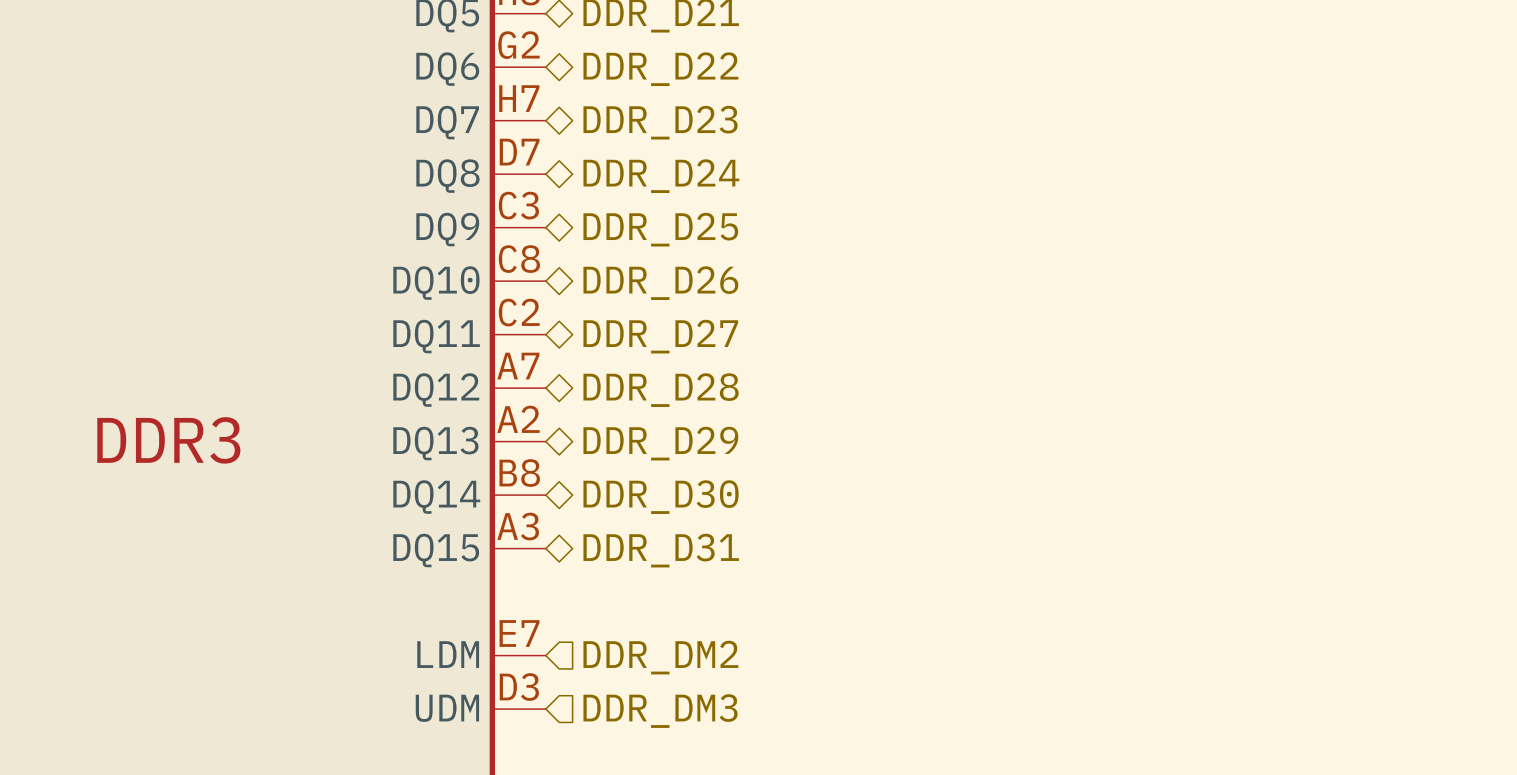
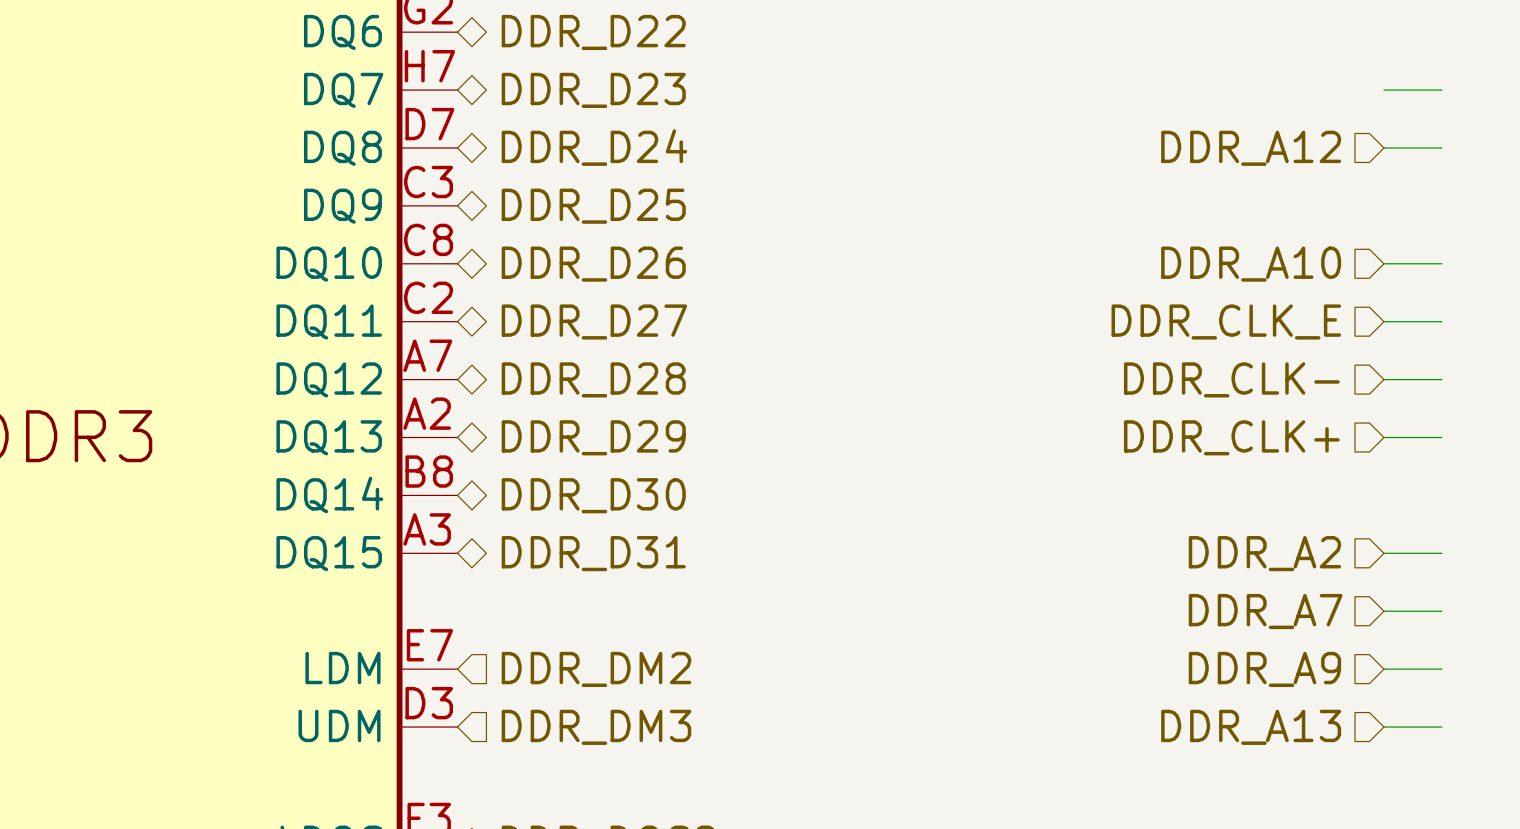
wire: none -> (1383, 90) (1441, 90)
wire: none -> (1383, 147) (1441, 147)
hierarchical label: none -> DDR_A12 (1251, 148)
wire: none -> (1383, 263) (1441, 263)
hierarchical label: none -> DDR_A10 (1251, 264)
wire: none -> (1383, 321) (1441, 321)
hierarchical label: none -> DDR_CLK_E (1226, 321)
wire: none -> (1383, 379) (1441, 379)
hierarchical label: none -> DDR_CLK- (1231, 379)
wire: none -> (1383, 437) (1441, 437)
hierarchical label: none -> DDR_CLK+ (1231, 437)
wire: none -> (1383, 553) (1441, 553)
hierarchical label: none -> DDR_A2 (1264, 553)
wire: none -> (1383, 611) (1441, 611)
hierarchical label: none -> DDR_A7 (1265, 611)
wire: none -> (1383, 669) (1441, 669)
hierarchical label: none -> DDR_A9 (1264, 669)
wire: none -> (1383, 727) (1441, 727)
hierarchical label: none -> DDR_A13 (1251, 727)

